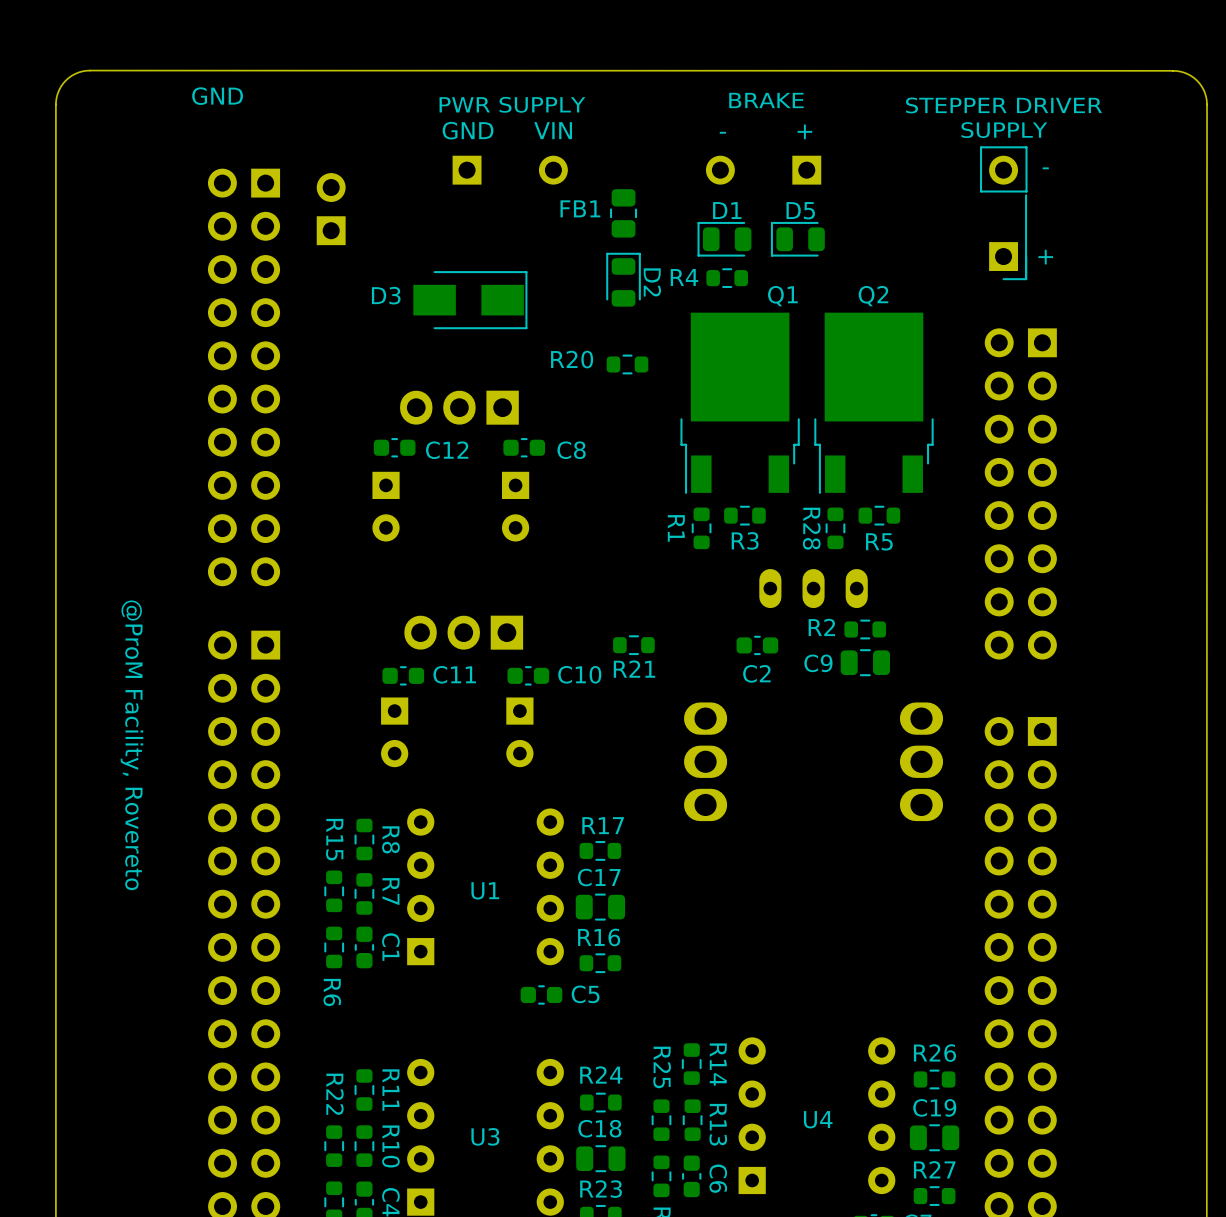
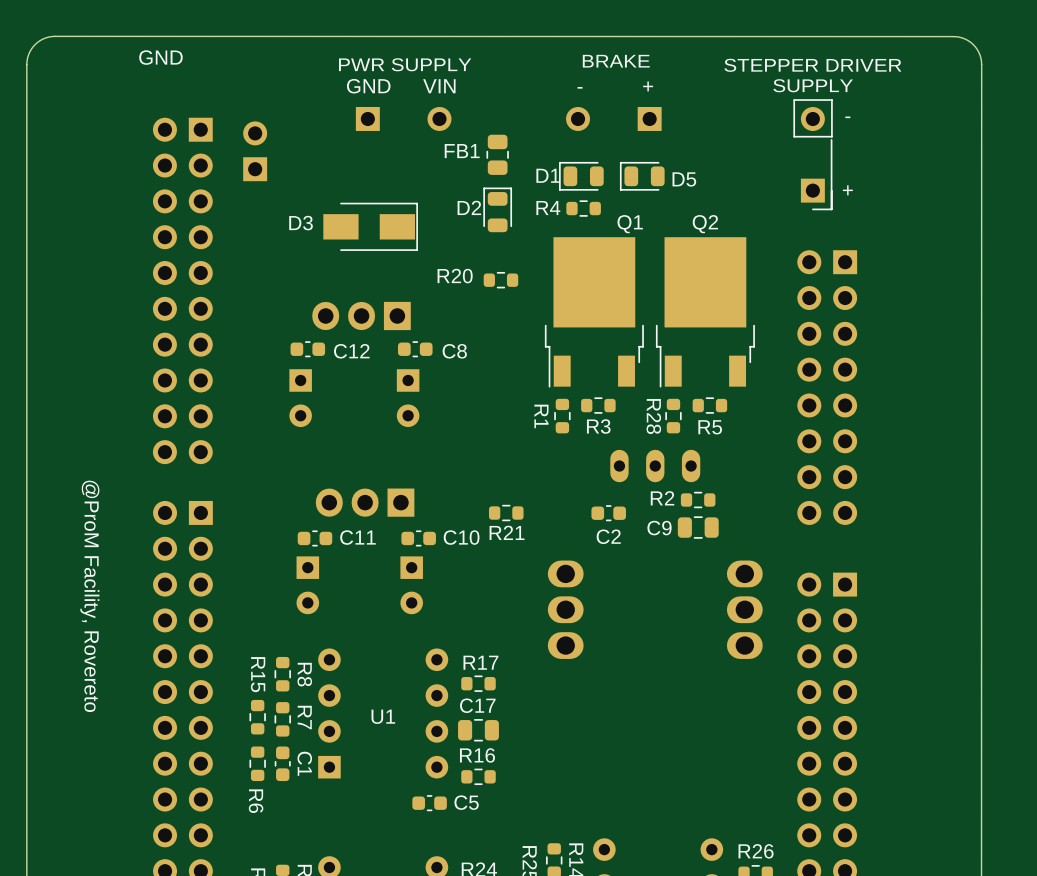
D1 name position: D1 (727, 210) -> D1 (548, 175)
D5 name position: D5 (800, 210) -> D5 (684, 179)
D2 name rotation: 0° (652, 282) -> 90° counterclockwise (469, 207)
D2 name position: D2 (652, 282) -> D2 (469, 207)

